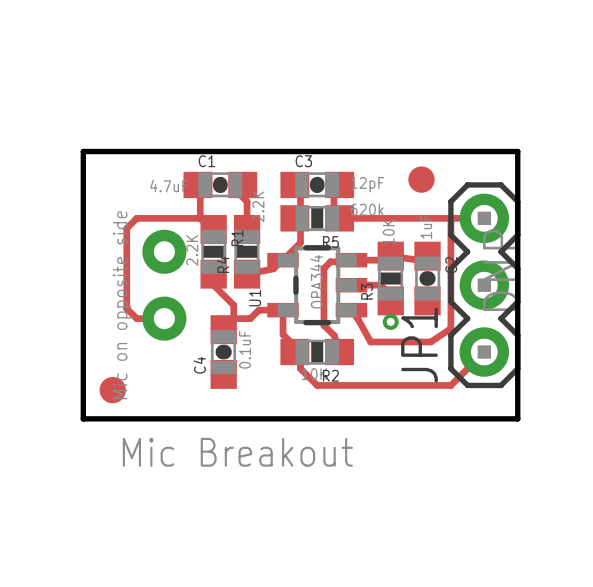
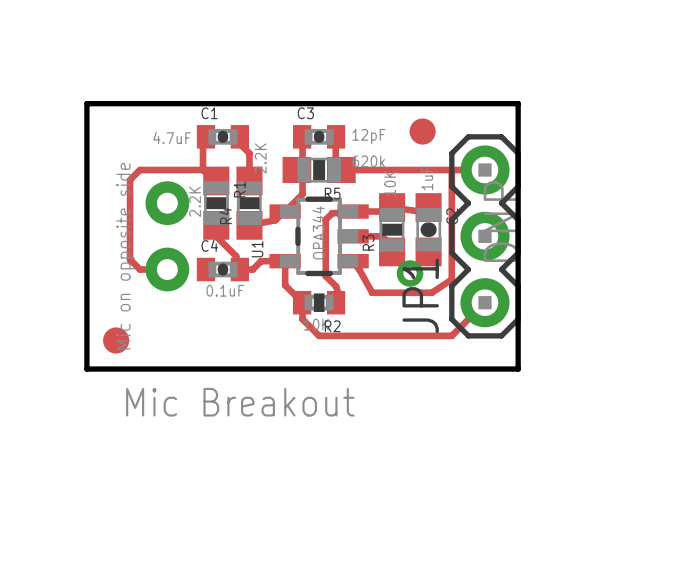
C1 footprint: [183, 171, 258, 199] -> [196, 125, 250, 149]
C3 footprint: [280, 171, 355, 199] -> [293, 125, 346, 149]
via size: [382, 313, 399, 330] -> [396, 260, 424, 287]
C4 footprint: [210, 315, 237, 389] -> [196, 257, 250, 282]
R2 footprint: [280, 338, 355, 366] -> [293, 290, 346, 315]

